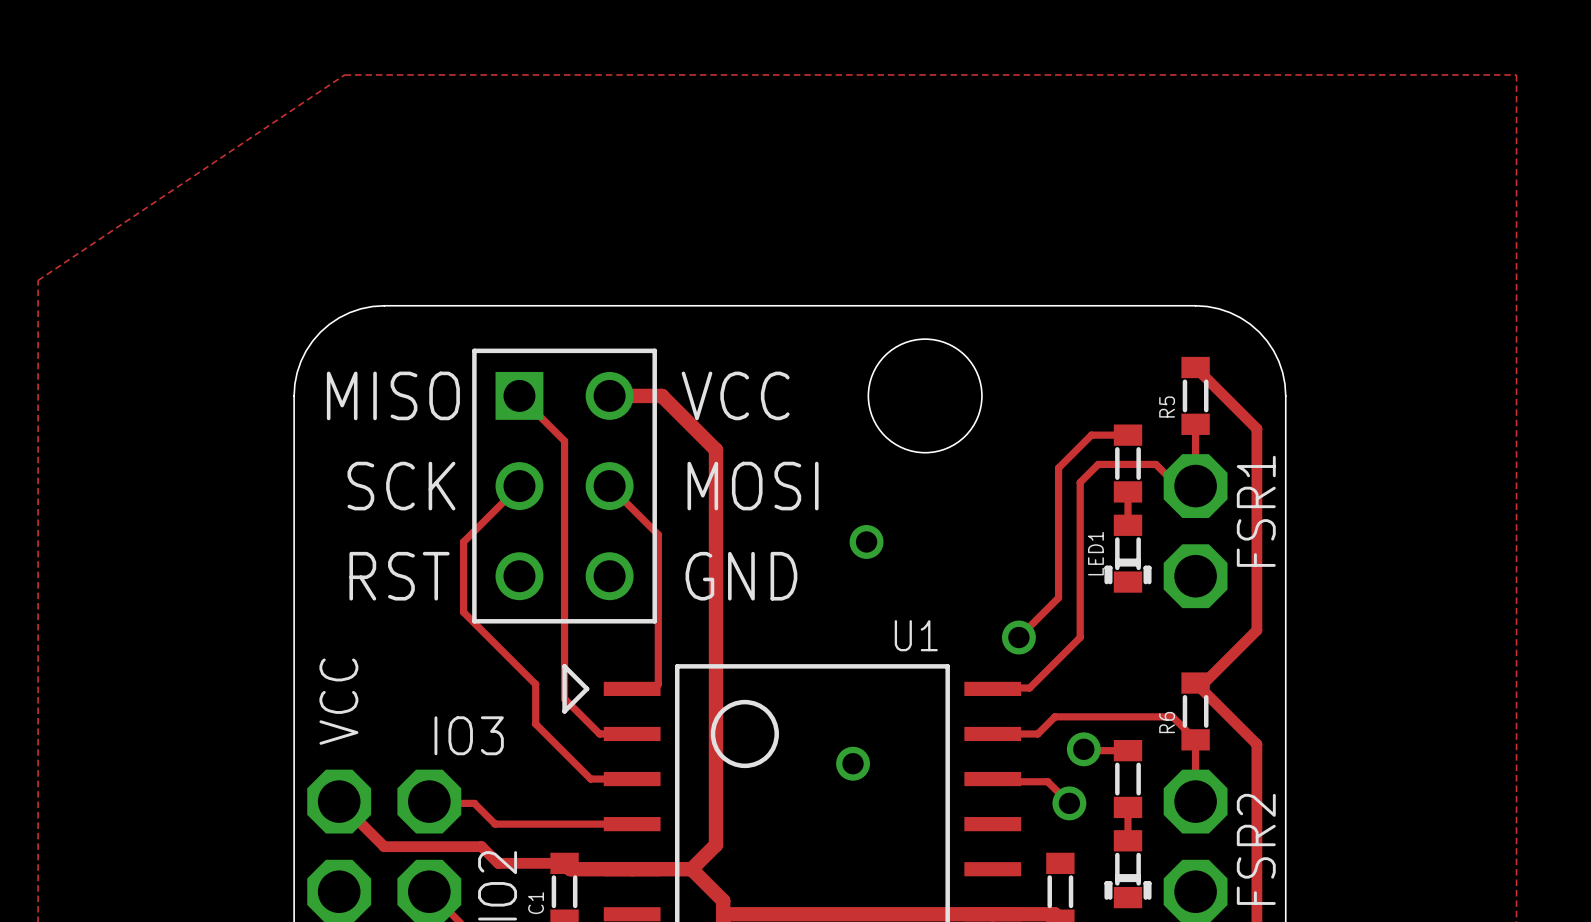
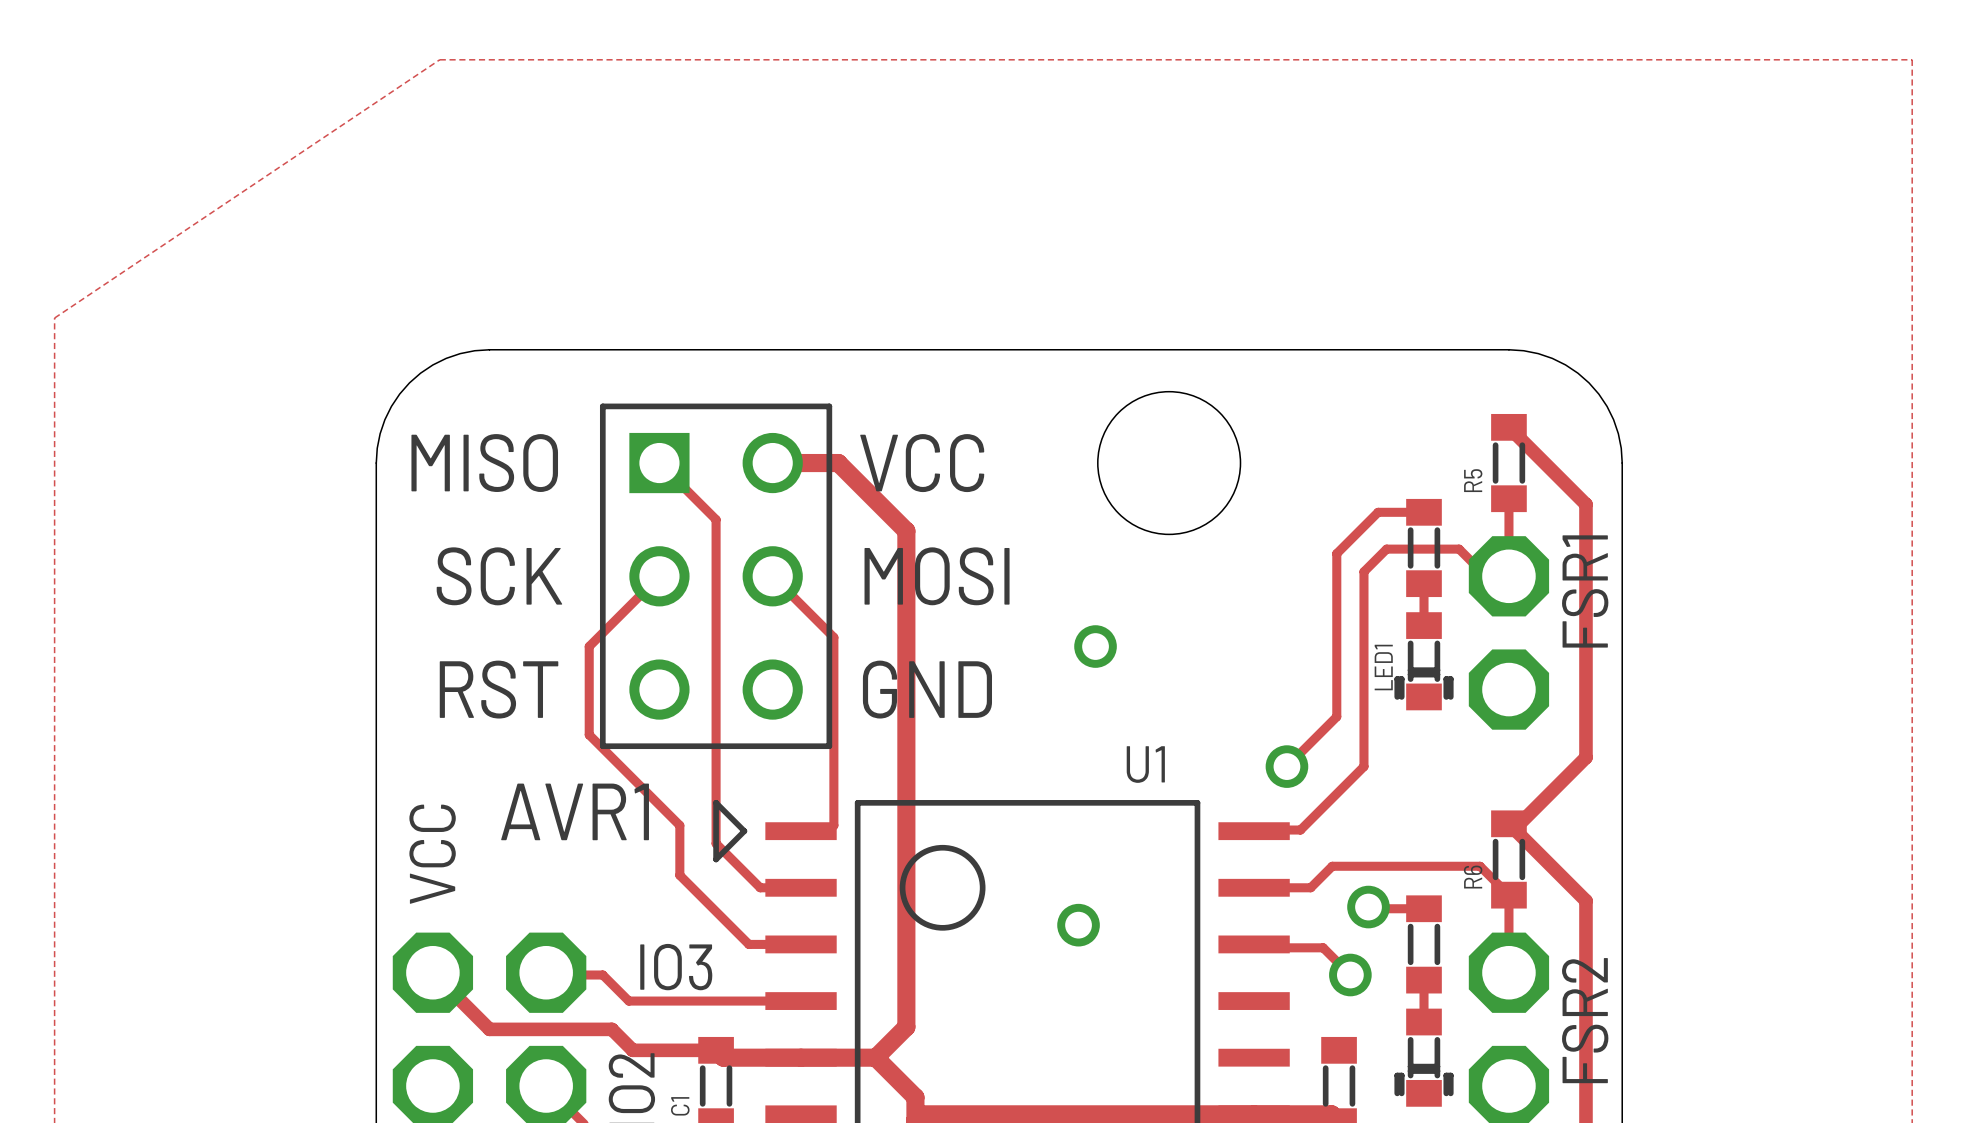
AVR1 name: none -> AVR1 (574, 811)
IO3 name position: IO3 (469, 735) -> IO3 (676, 967)

